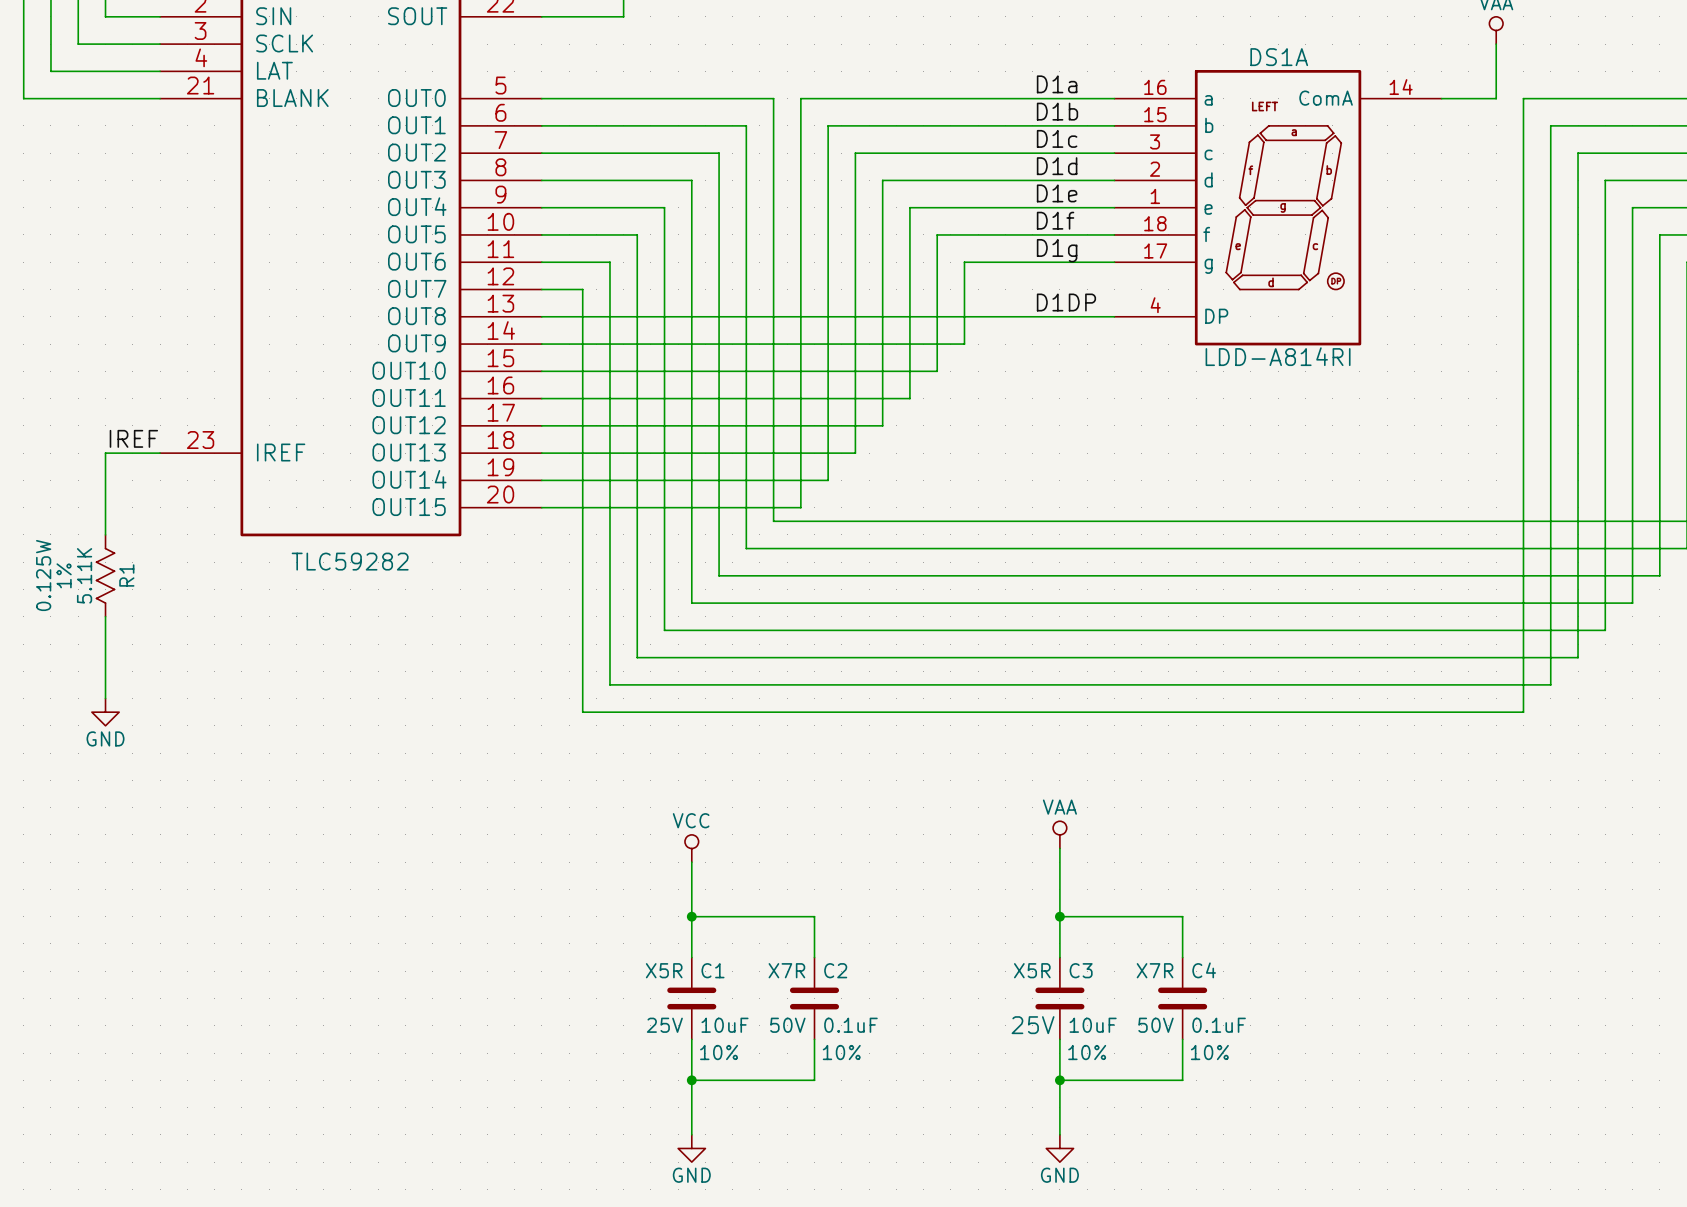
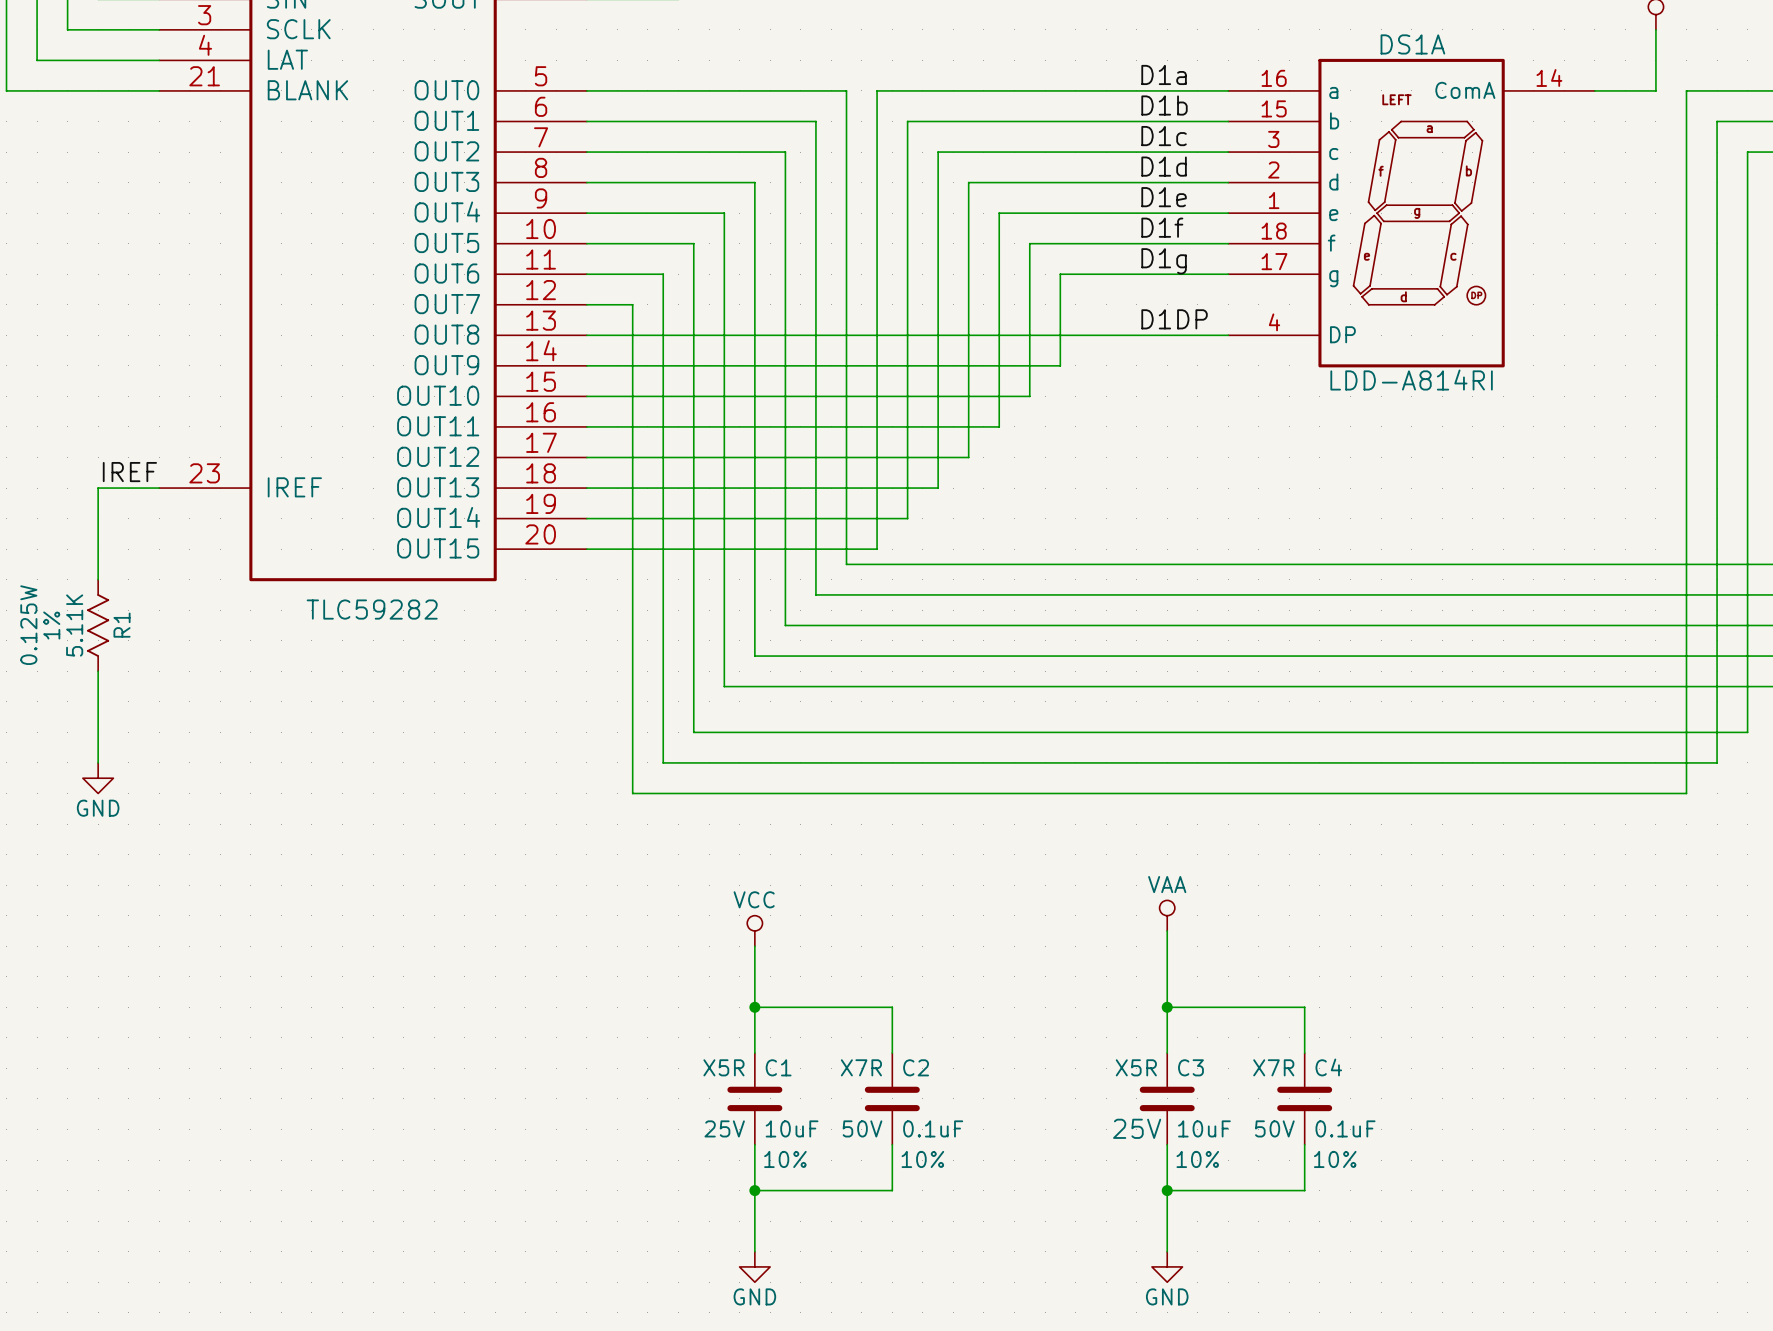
wire: (637, 657) (1578, 657) -> (693, 717) (693, 732) (1747, 732) (1747, 717)
wire: (609, 684) (1550, 684) -> (663, 747) (663, 762) (1717, 762) (1717, 747)
wire: (582, 712) (1523, 712) -> (632, 778) (632, 793) (1686, 793) (1686, 778)

